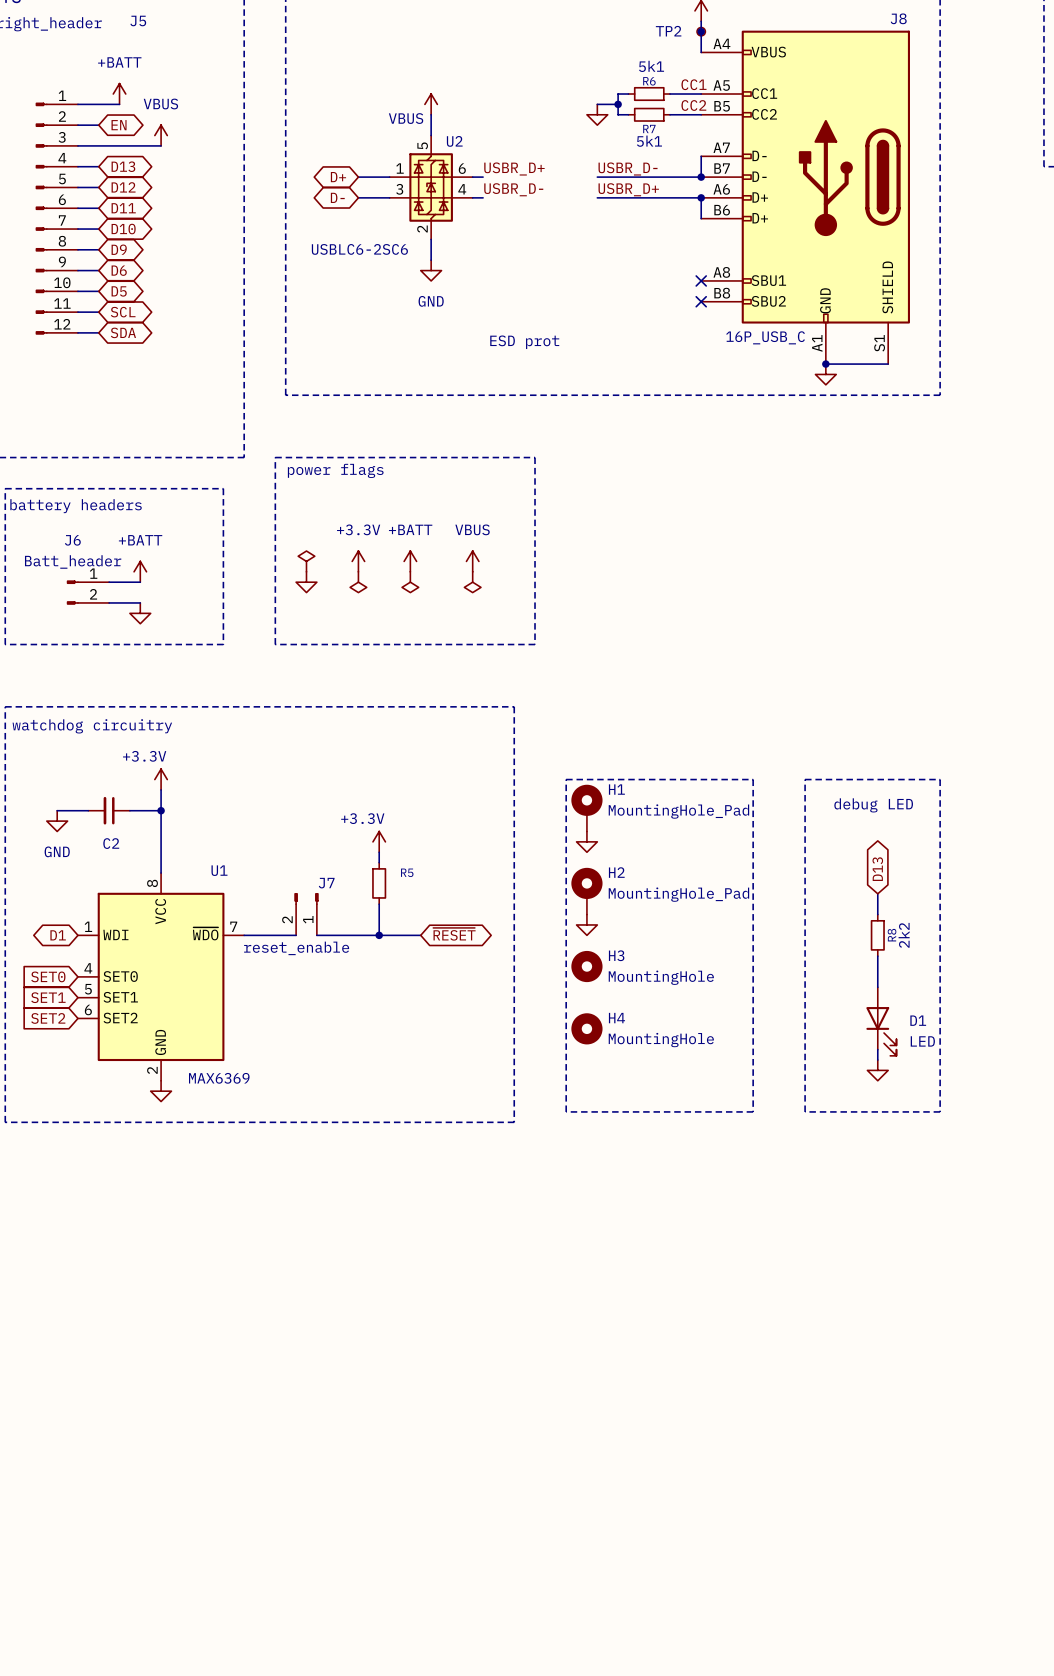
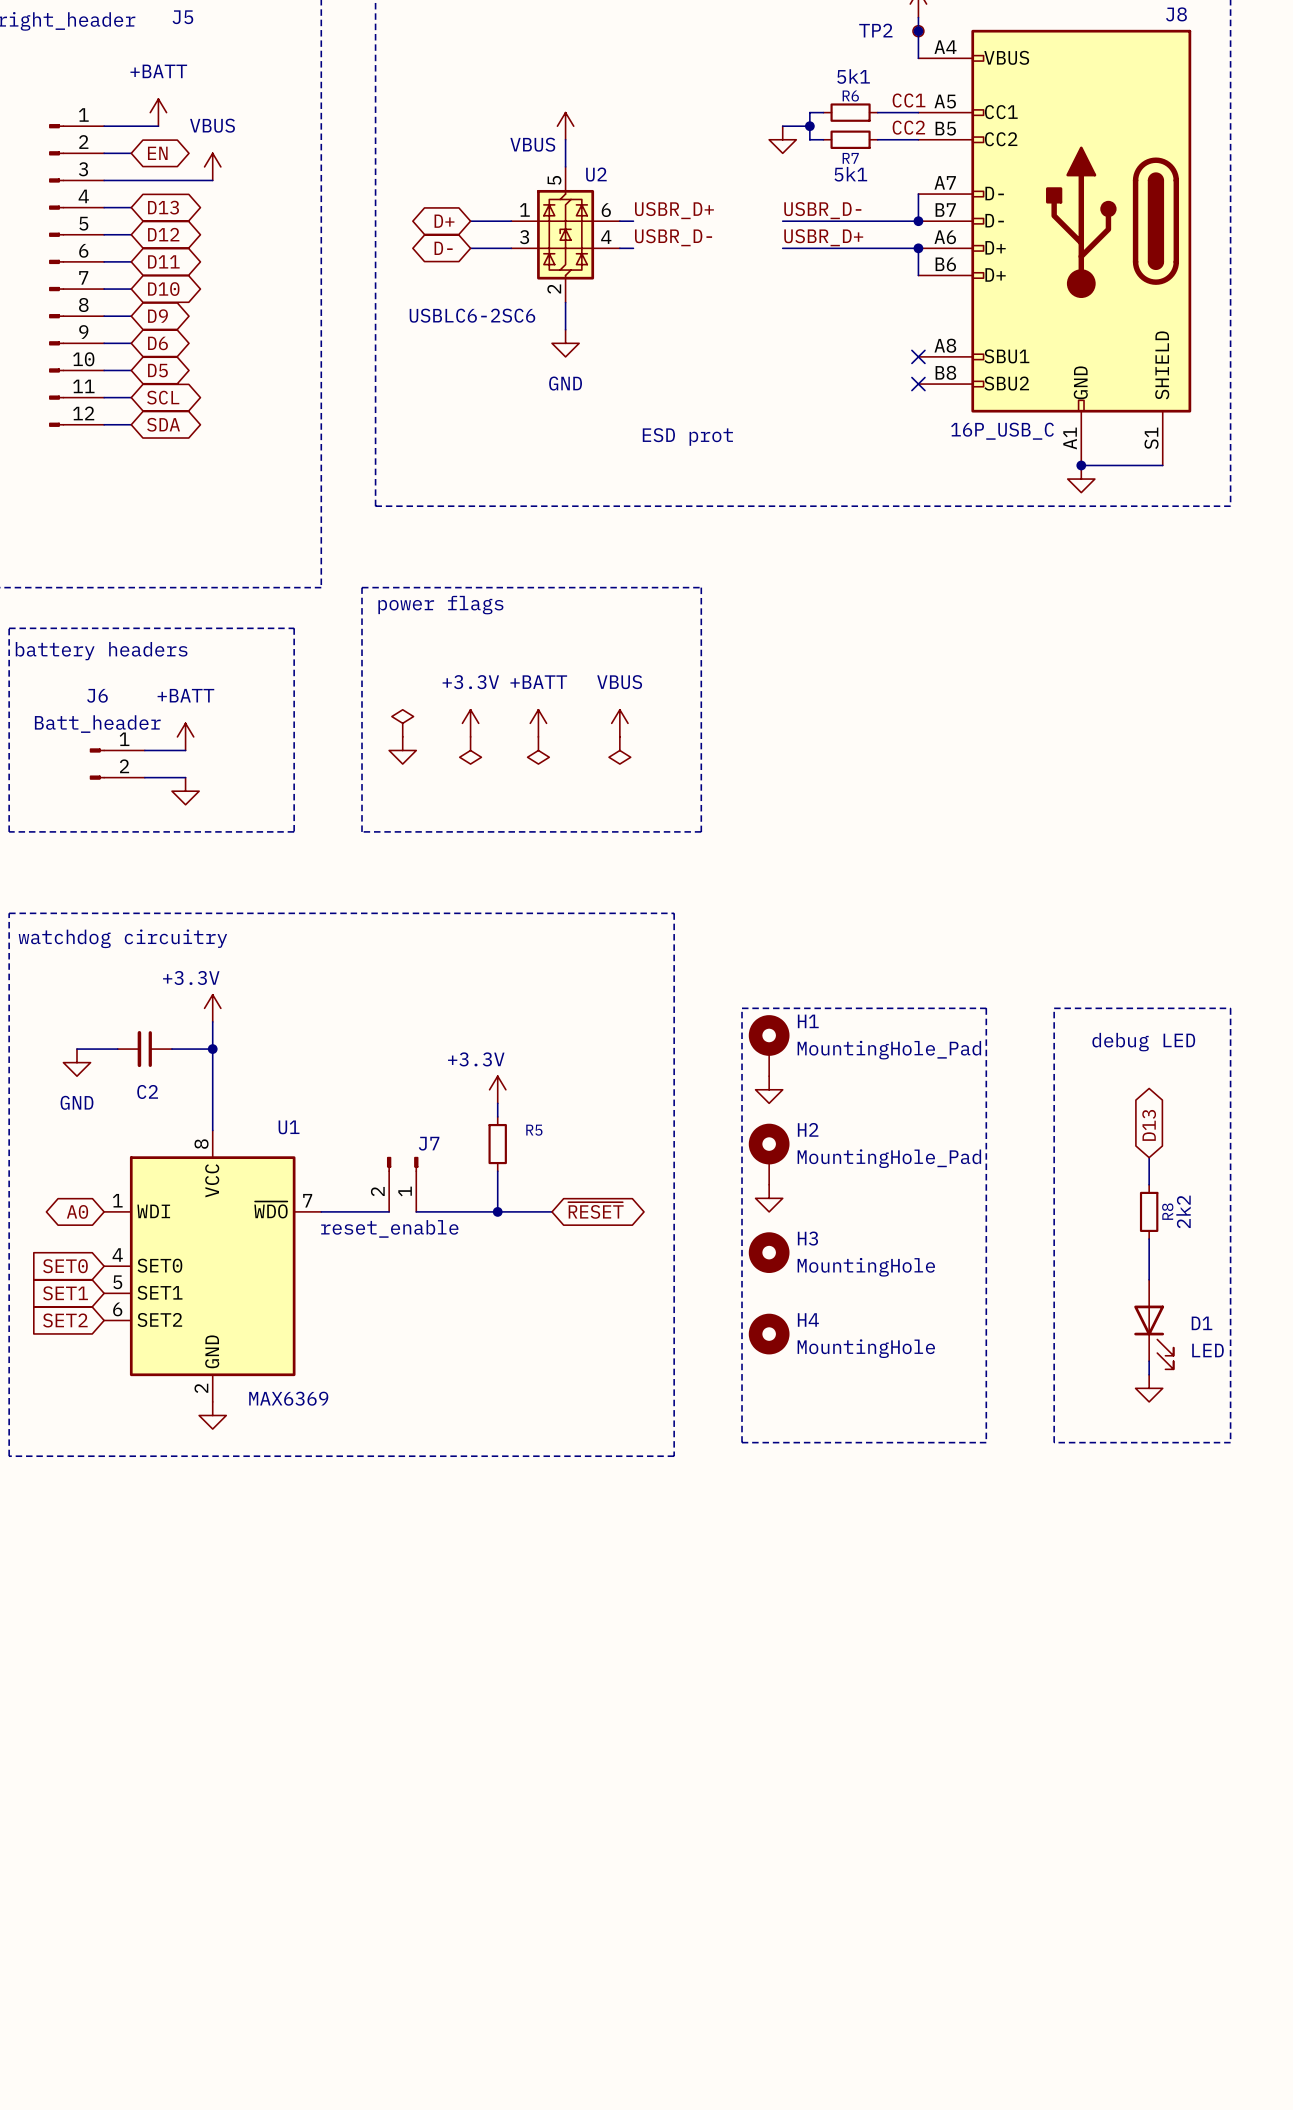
global label: D1 (58, 935) -> A0 (77, 1211)

